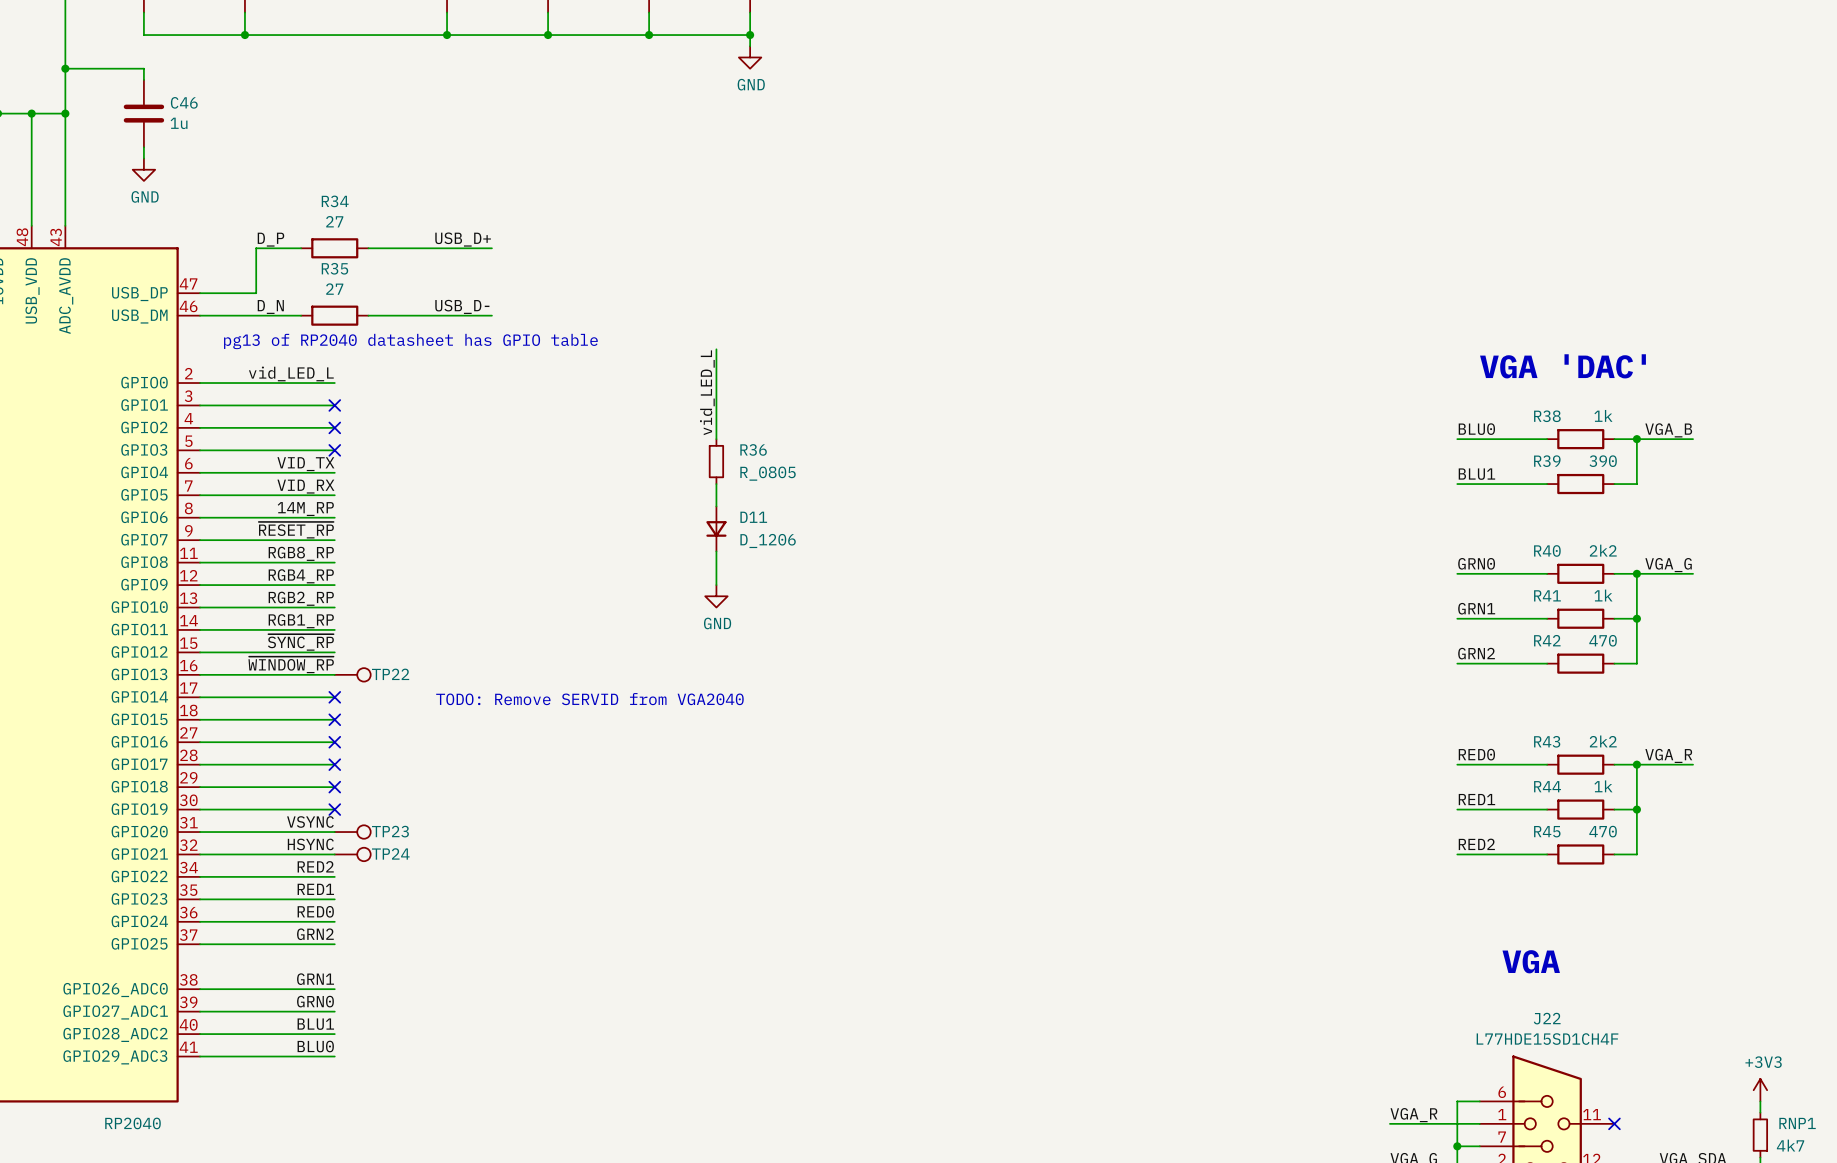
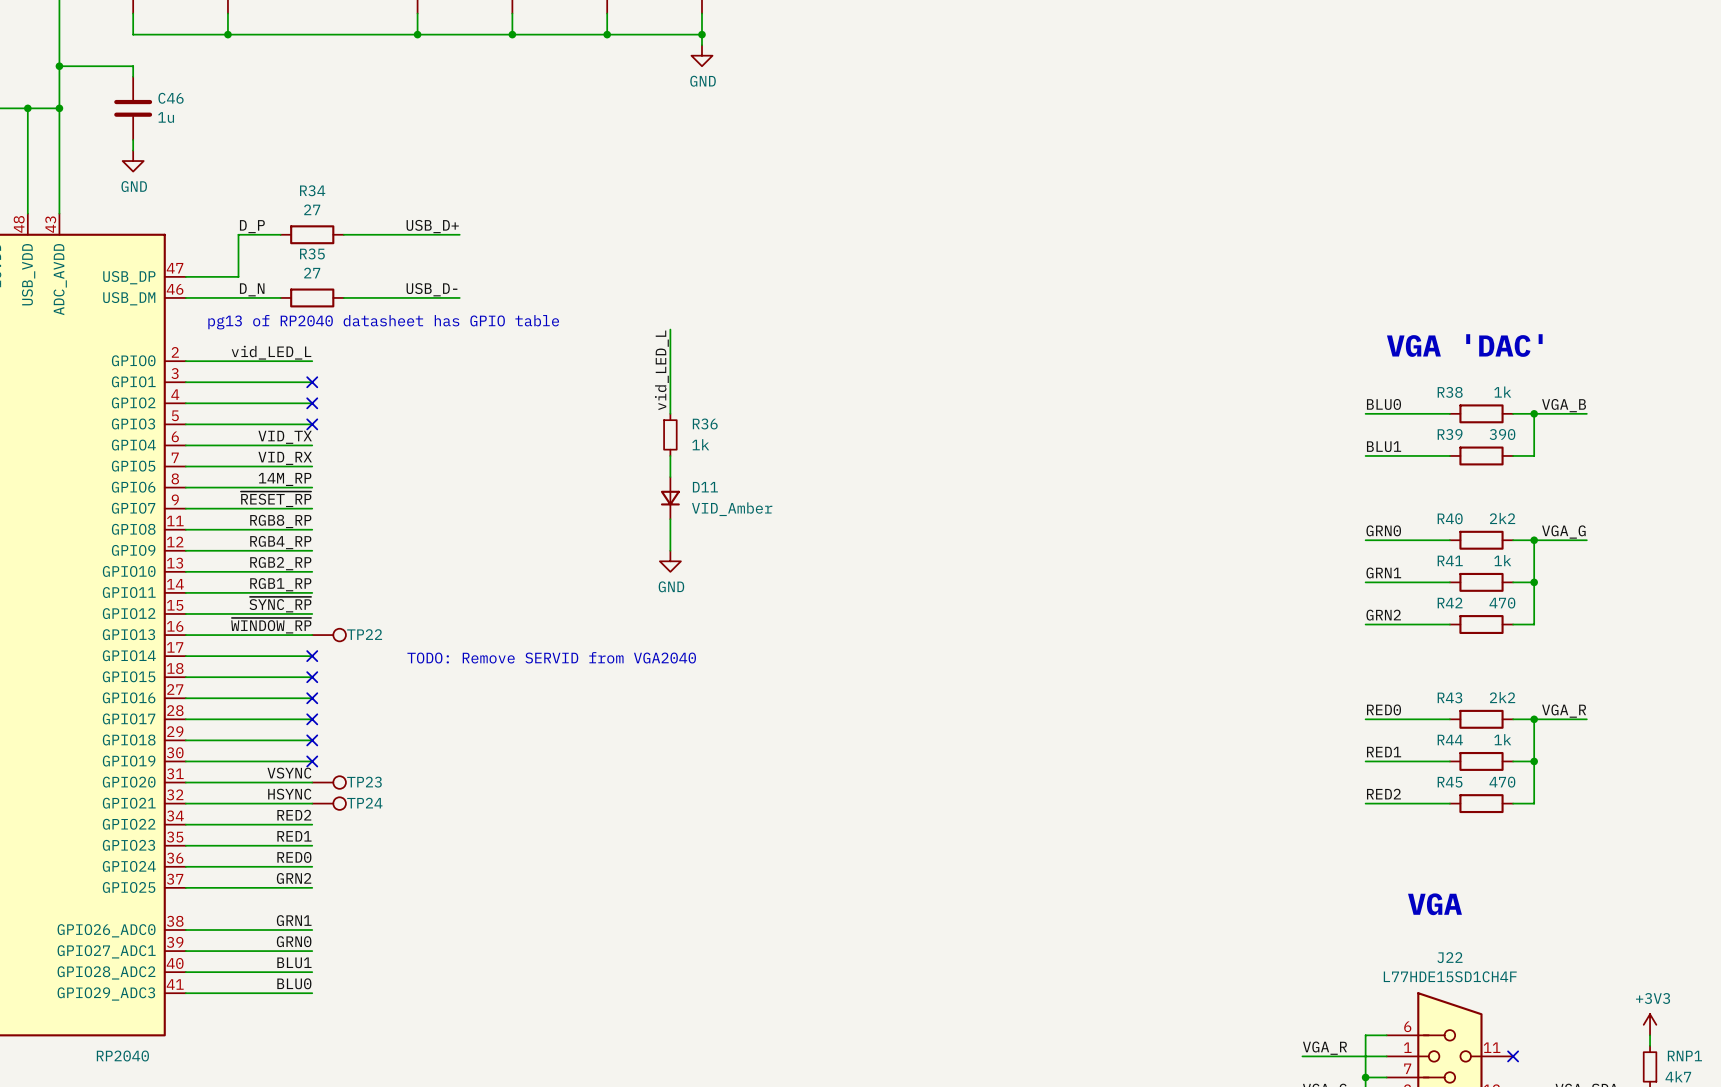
R36 value: R_0805 (768, 473) -> 1k (700, 444)
D11 value: D_1206 (768, 541) -> VID_Amber (732, 509)

